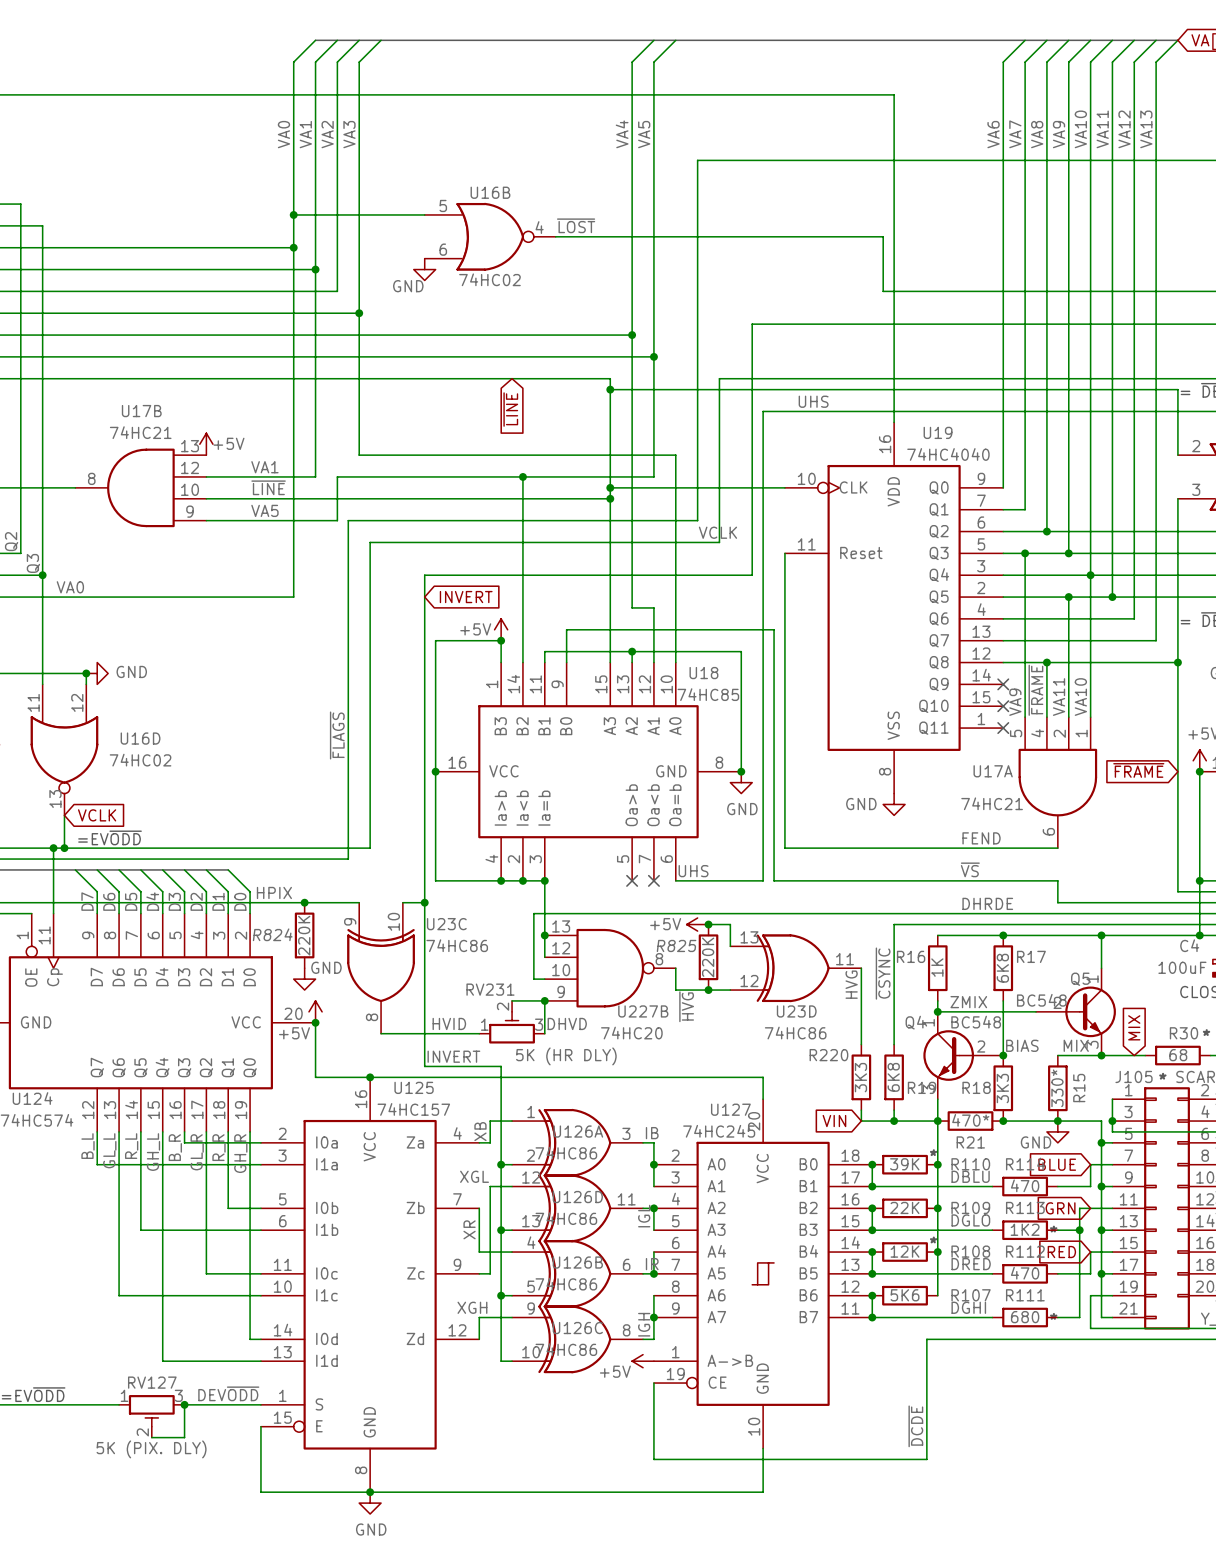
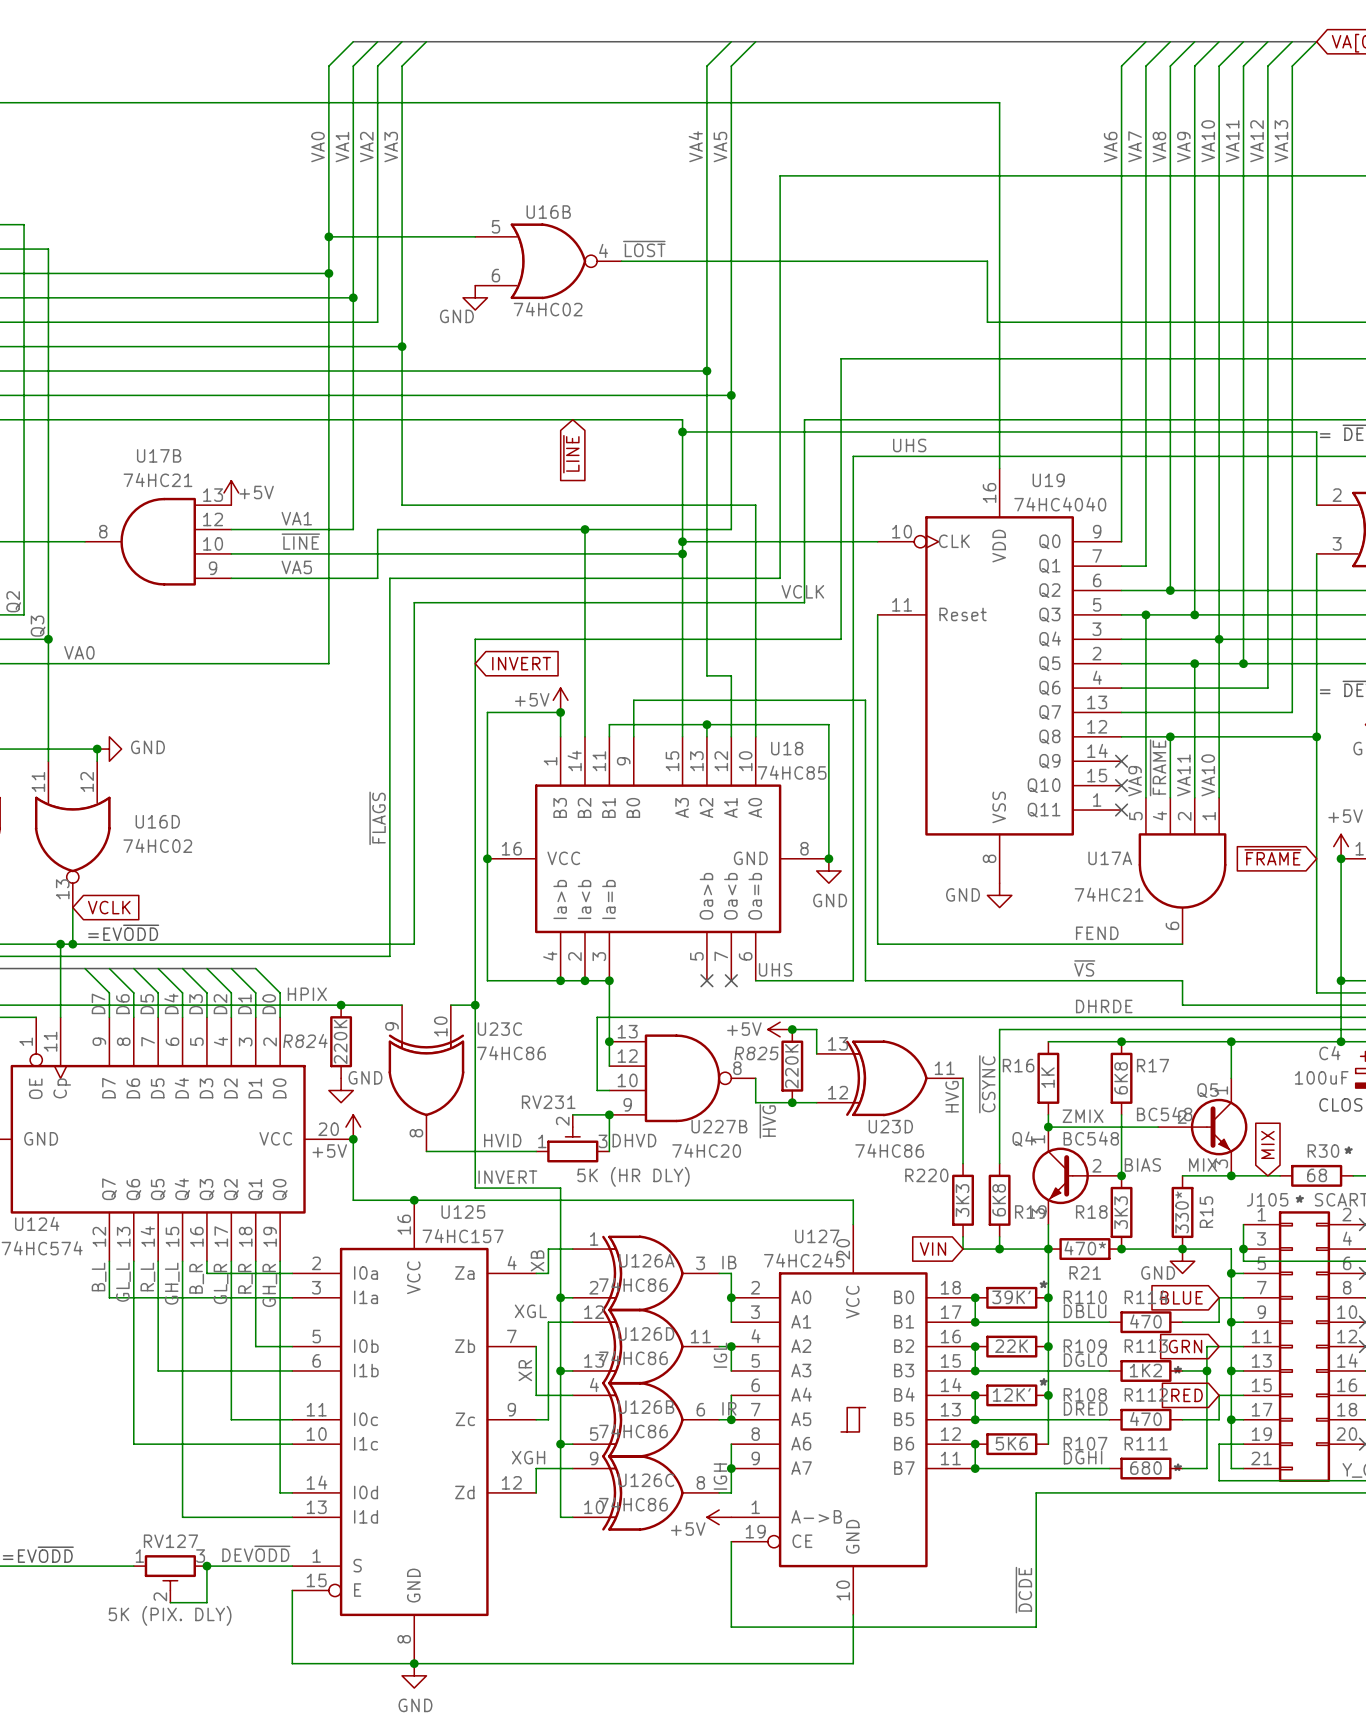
R110 value: 39K (904, 1164) -> 39K' (1011, 1297)
R108 value: 12K (905, 1251) -> 12K' (1011, 1394)

